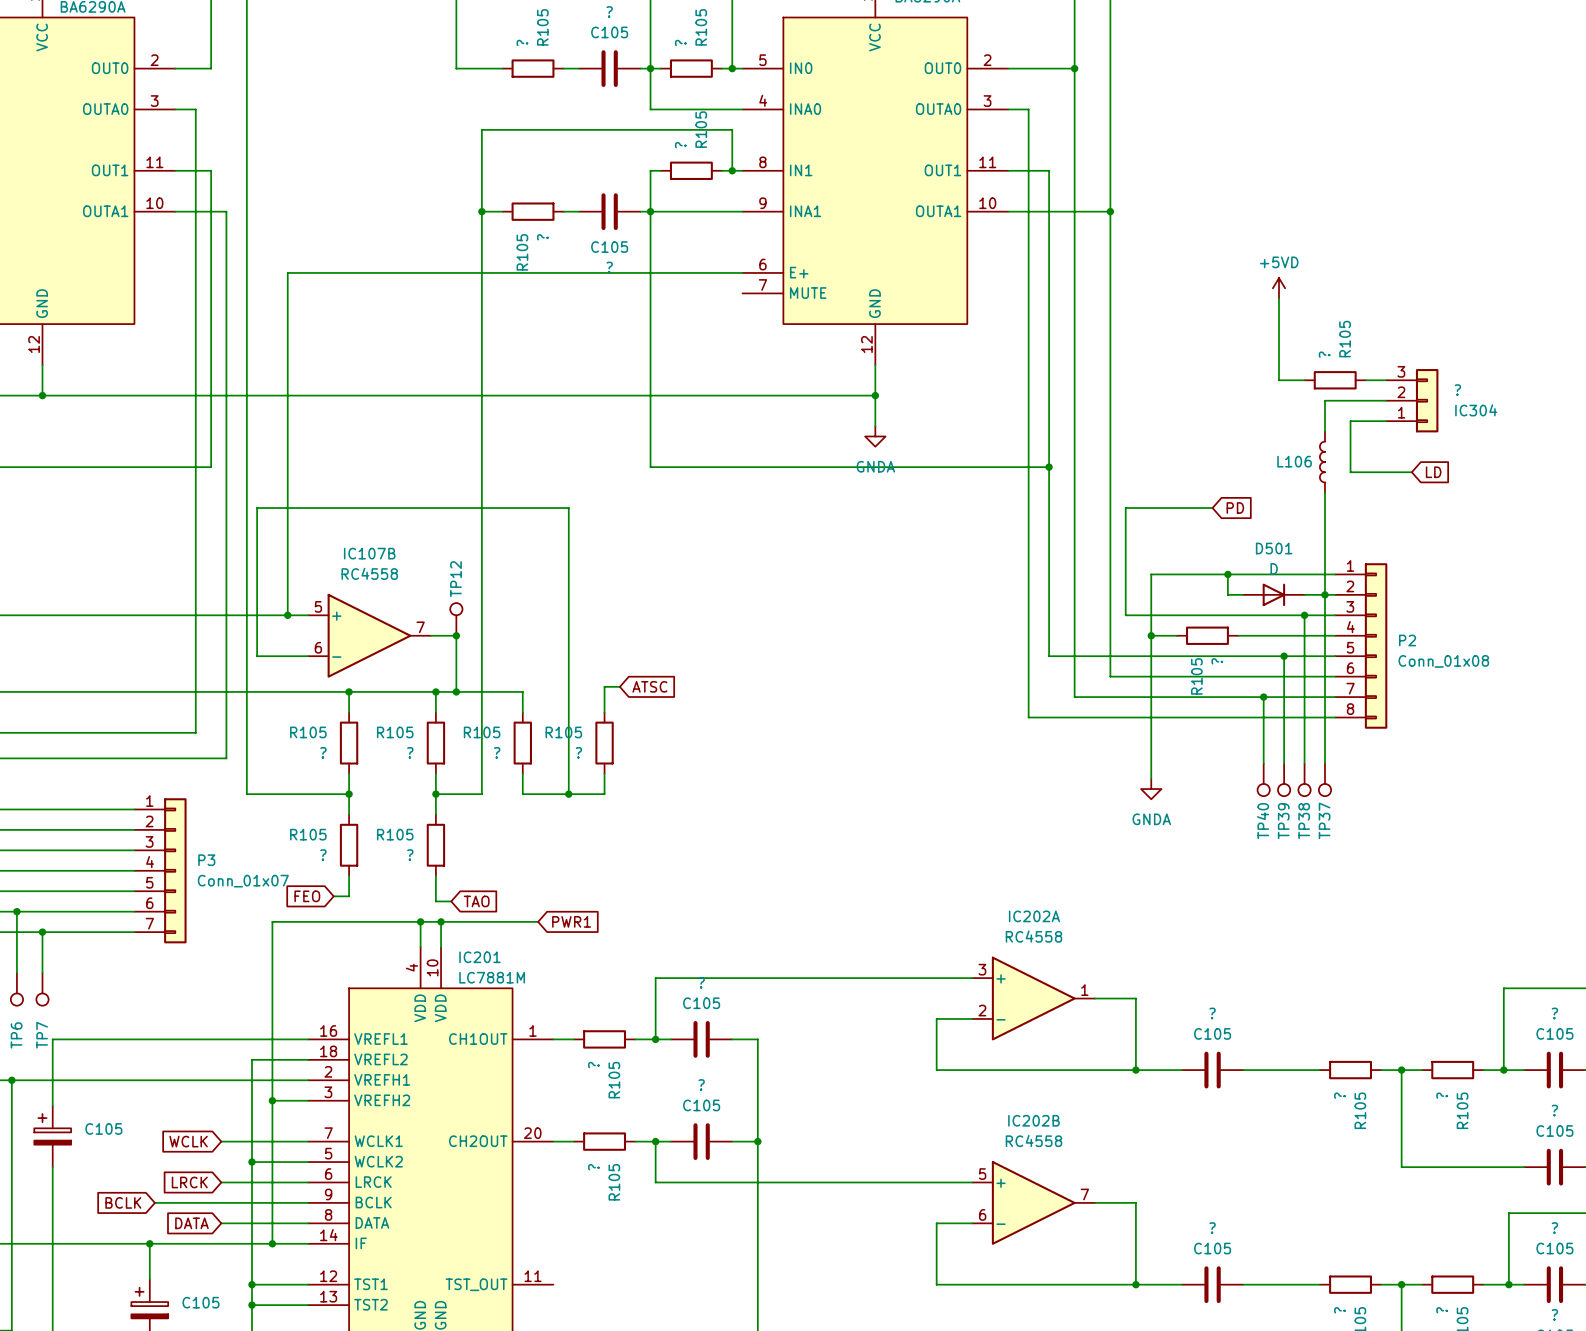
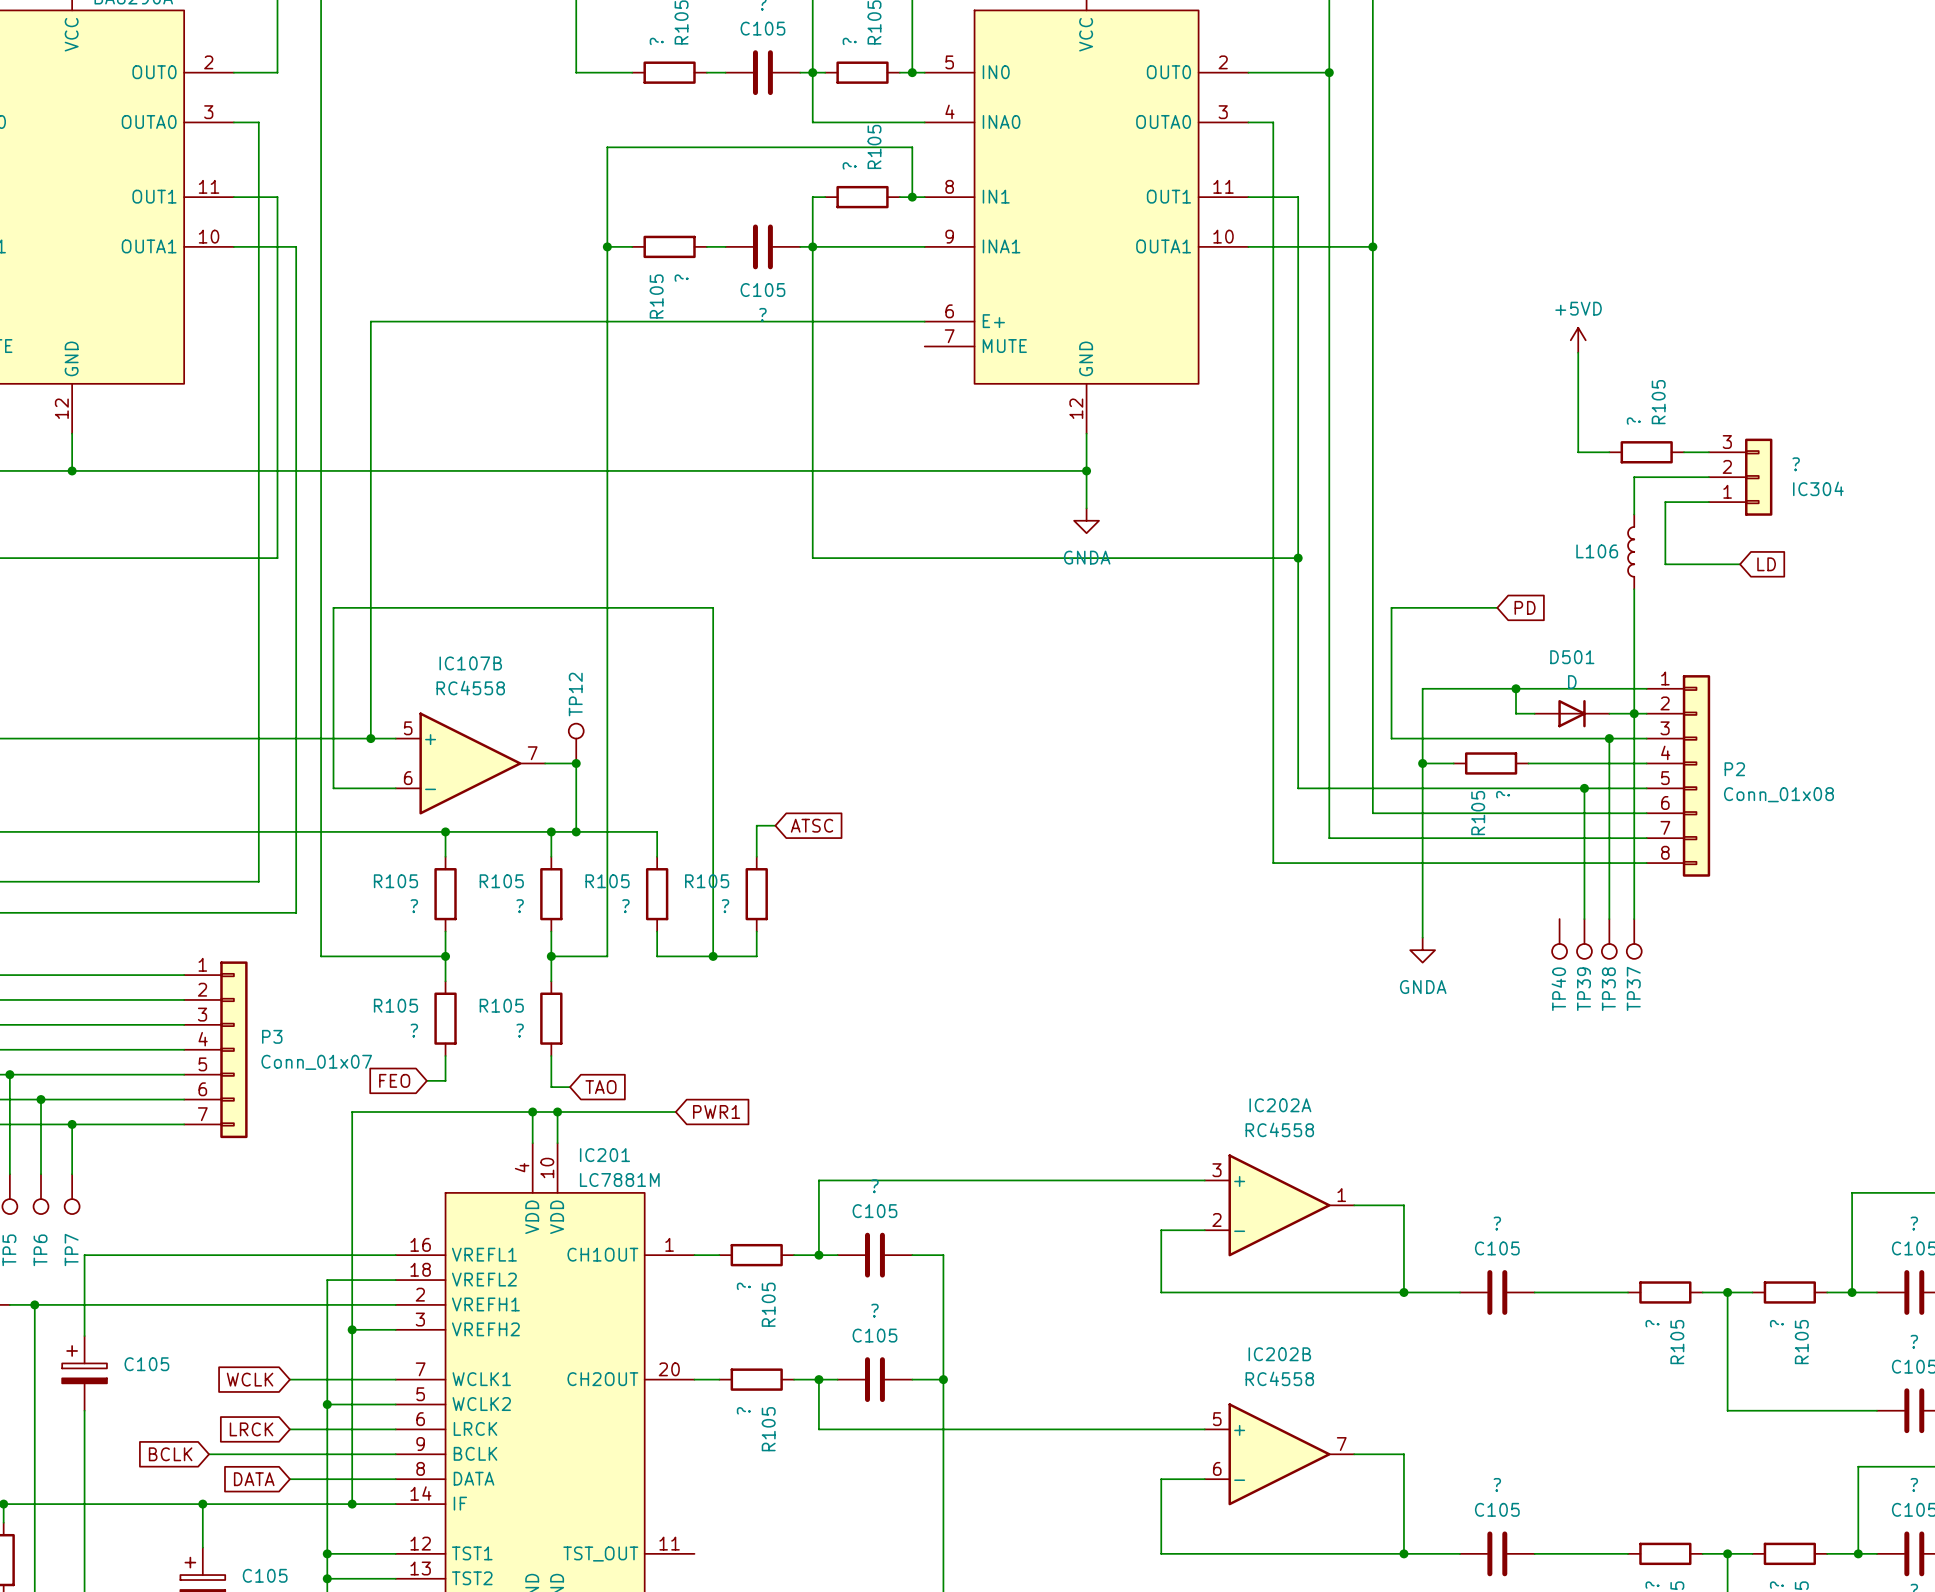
wire: (1263, 697) (1263, 763) -> none
junction: (1263, 697) -> none

